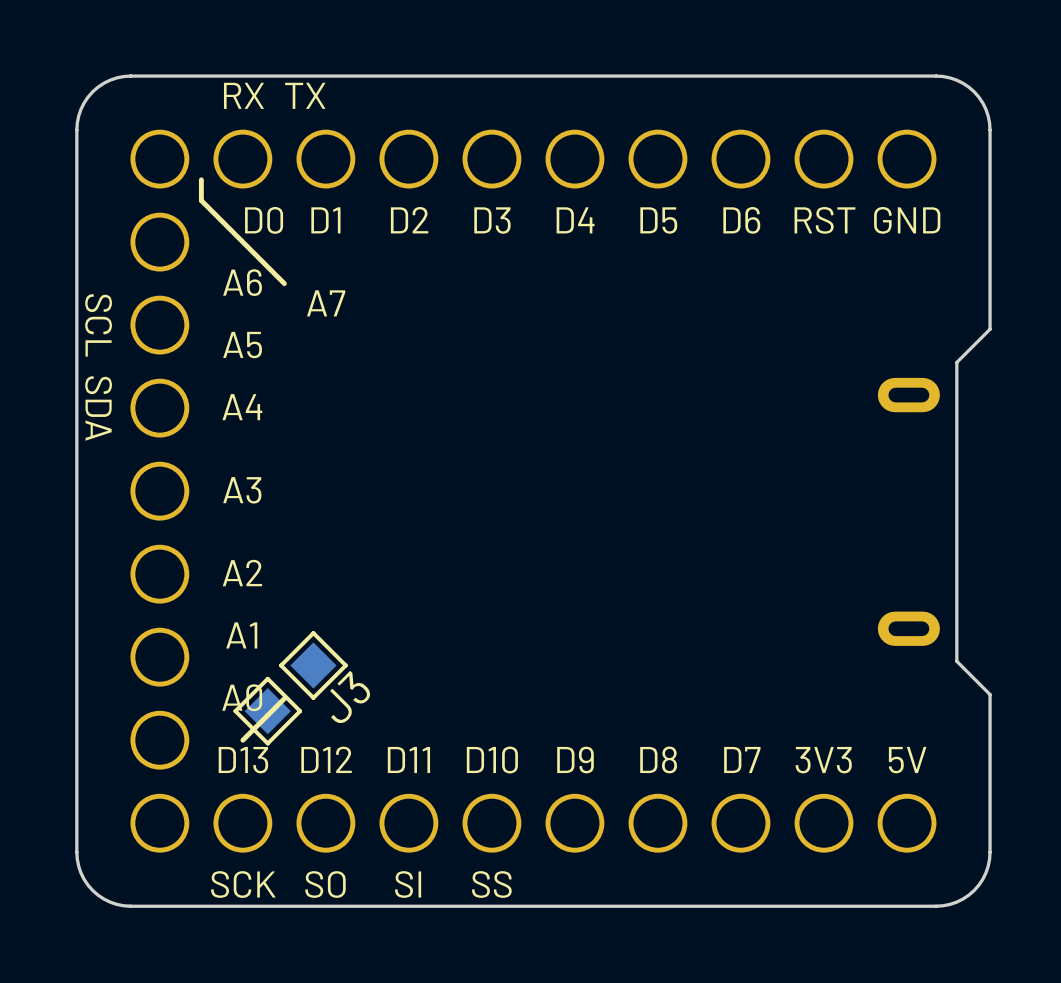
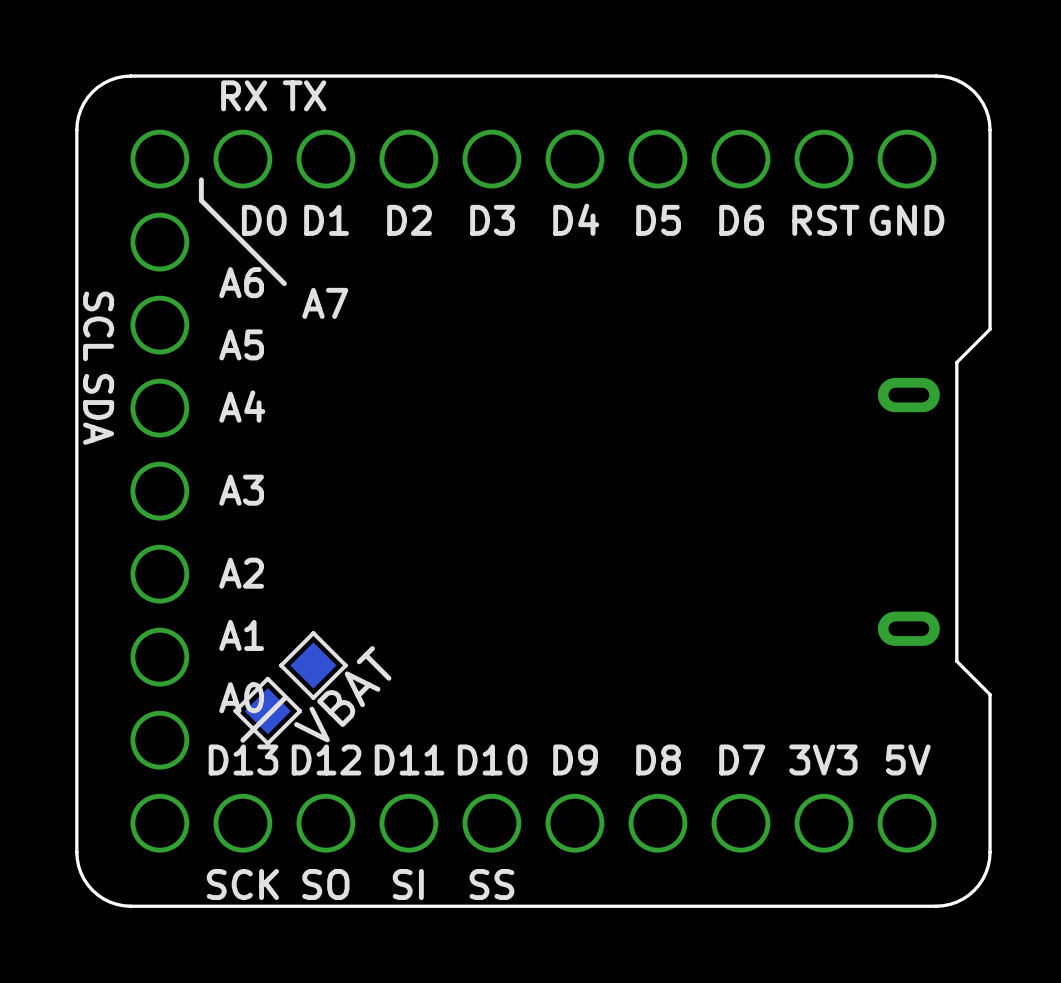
J3 name: J3 (350, 697) -> VBAT (342, 694)

